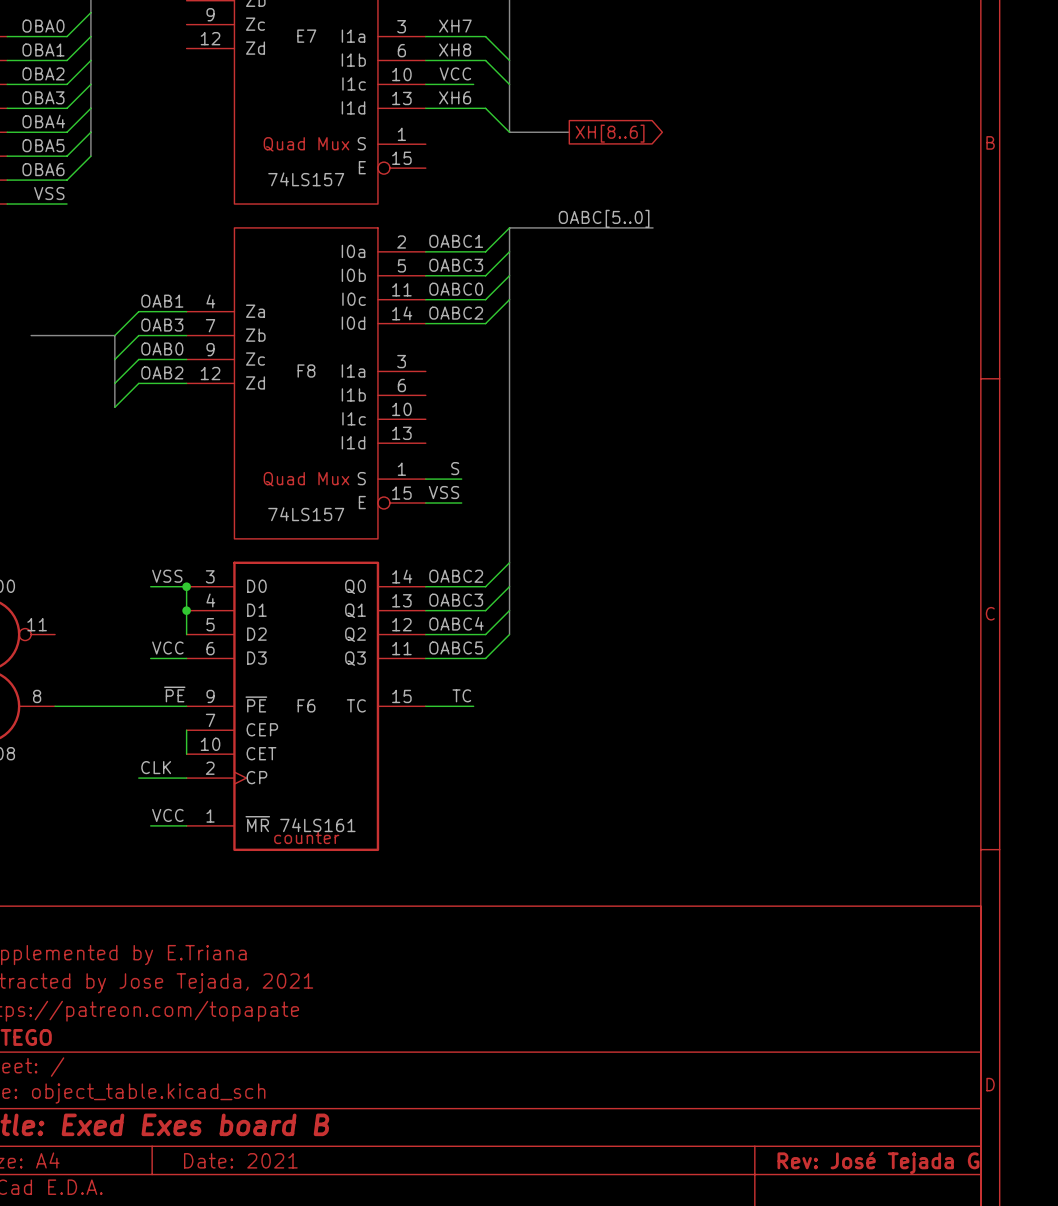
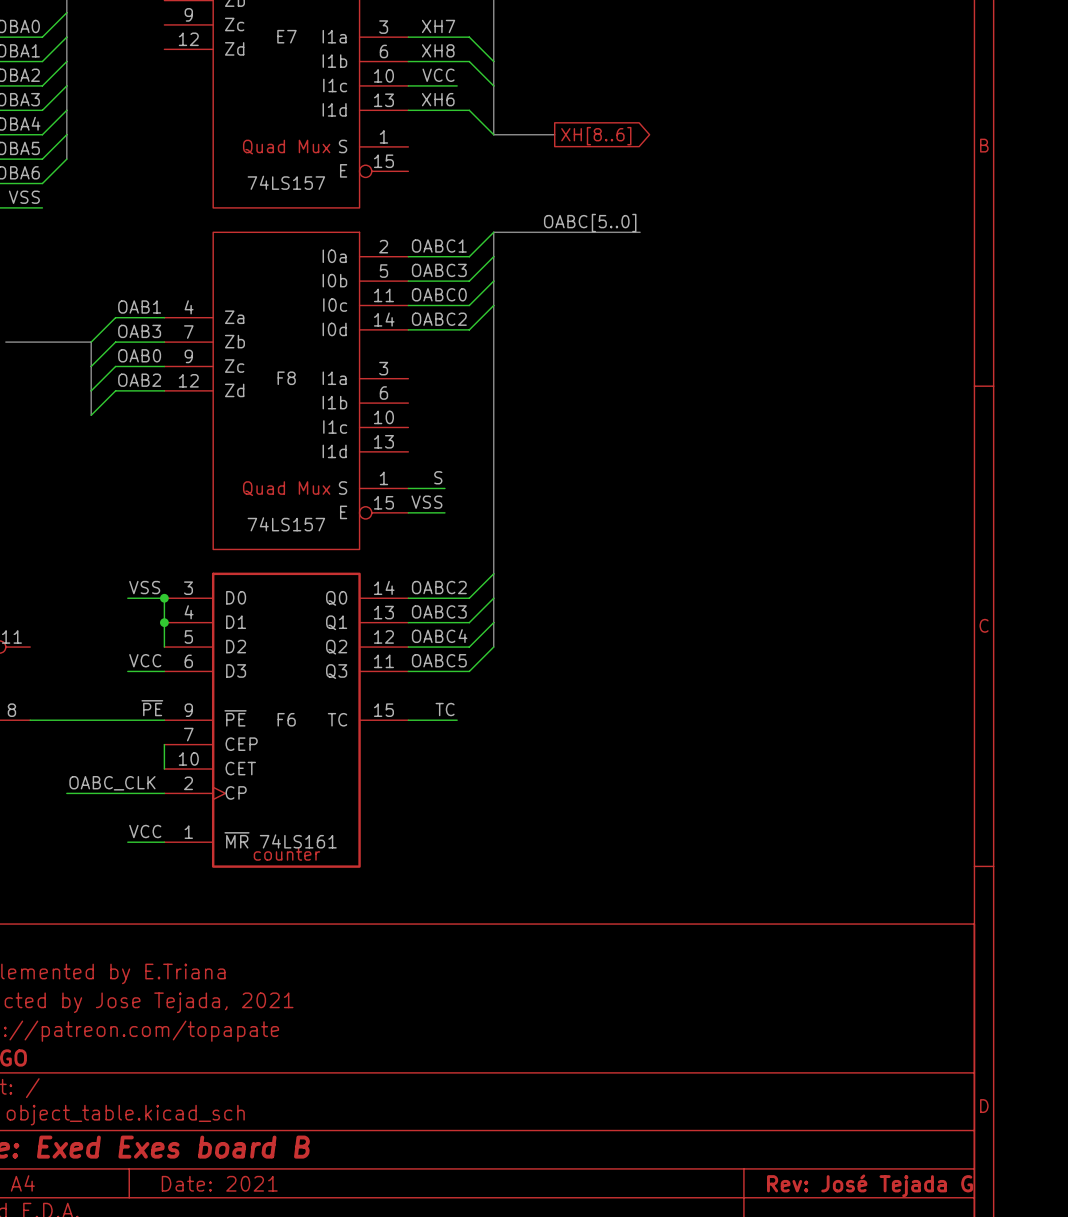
label: CLK (156, 767) -> none
label: none -> OABC_CLK (112, 783)
wire: none -> (66, 793) (115, 793)

